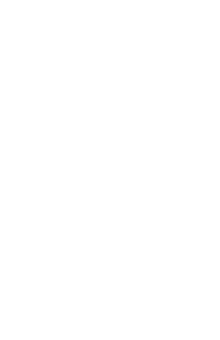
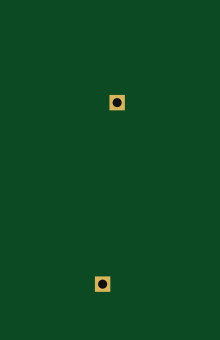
part: none -> (117, 102)
part: none -> (102, 284)

